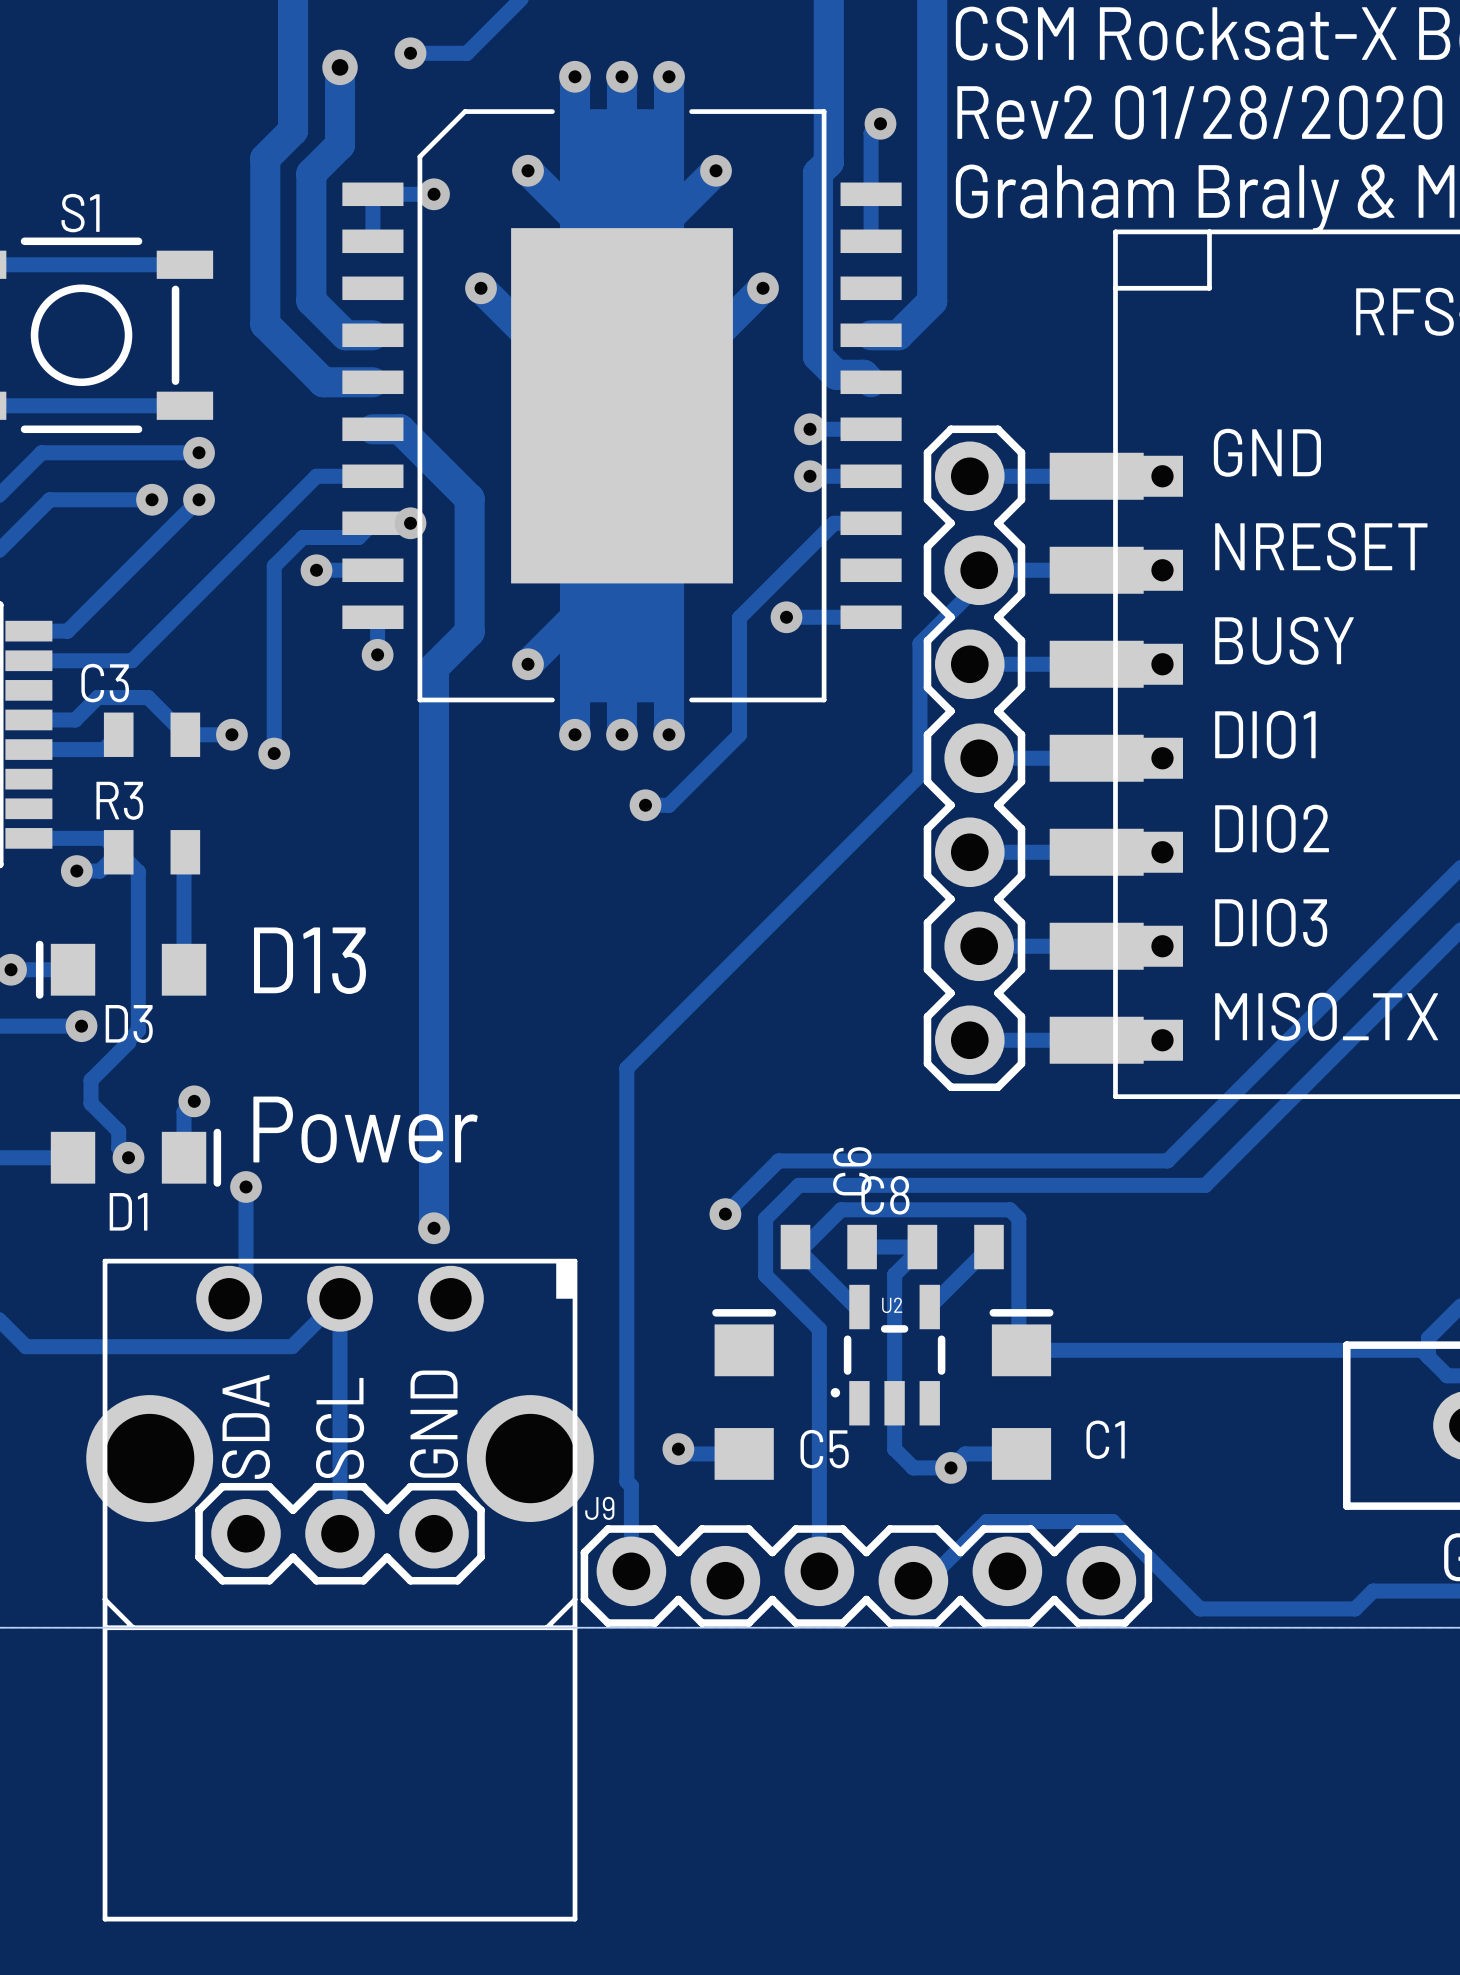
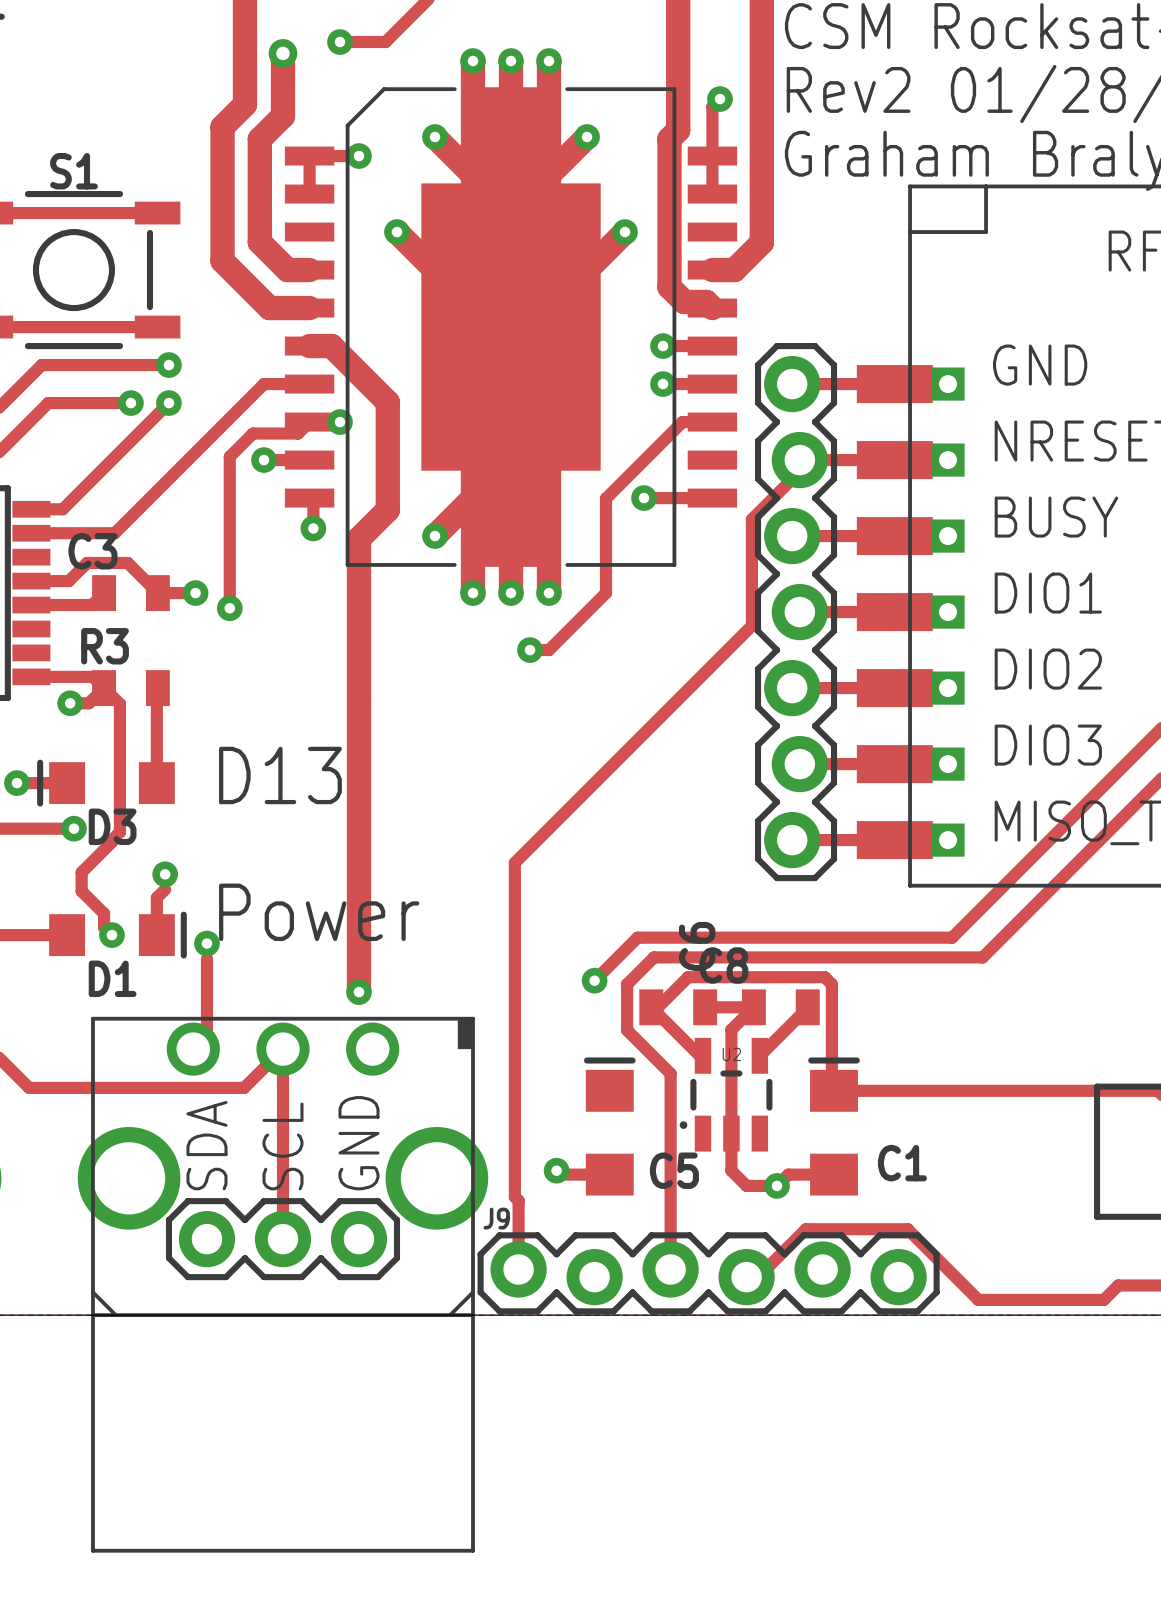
via position: (194, 1101) -> (165, 874)
via position: (246, 1186) -> (206, 943)

